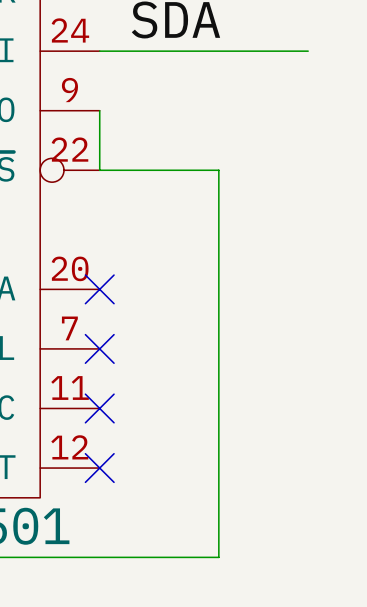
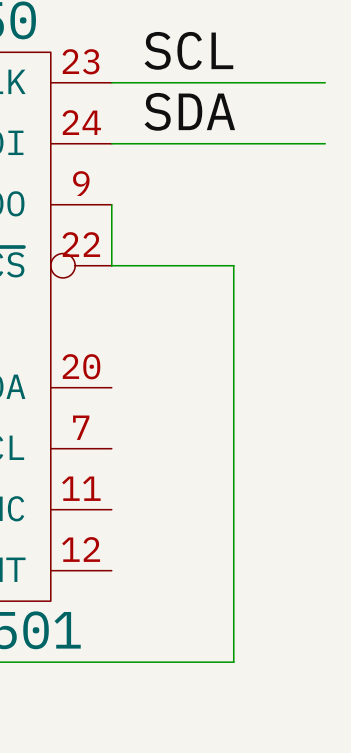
no-connect mark: (99, 289) -> none
no-connect mark: (99, 348) -> none
no-connect mark: (99, 408) -> none
no-connect mark: (99, 468) -> none

